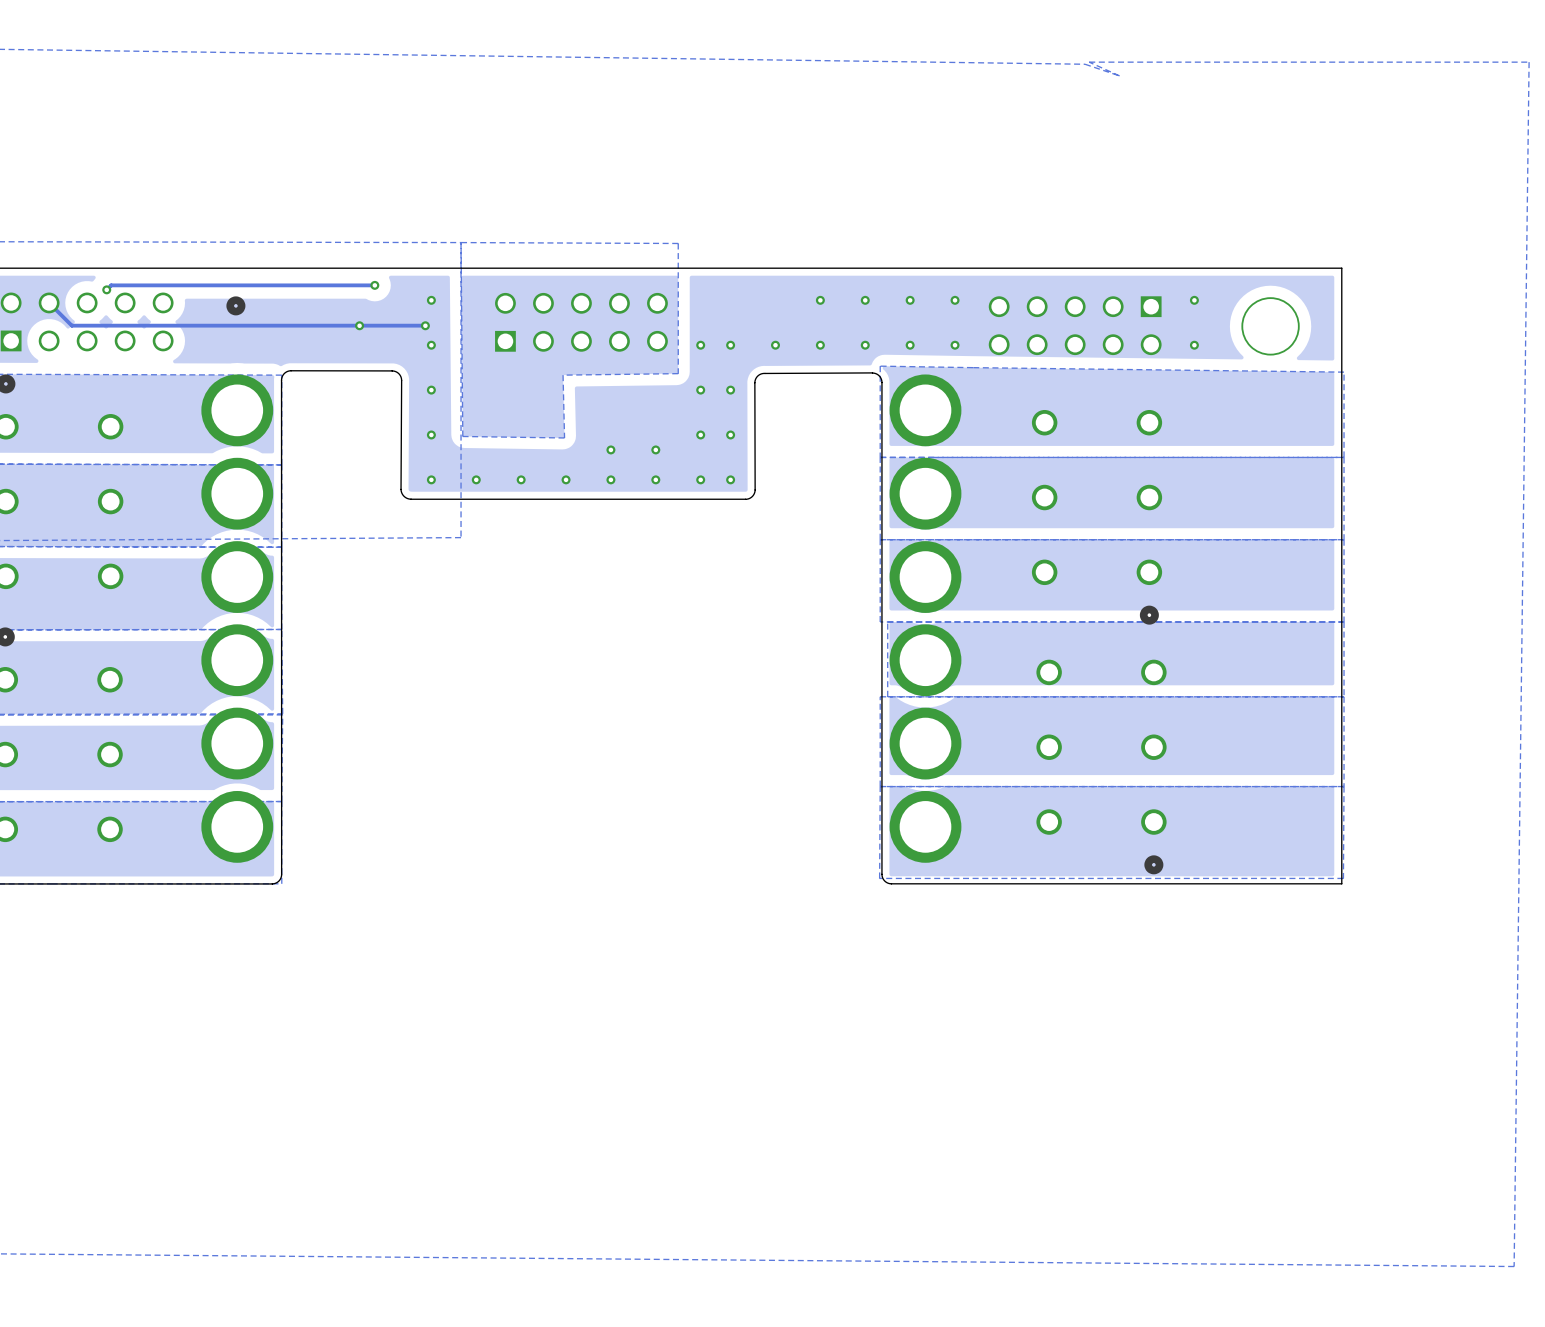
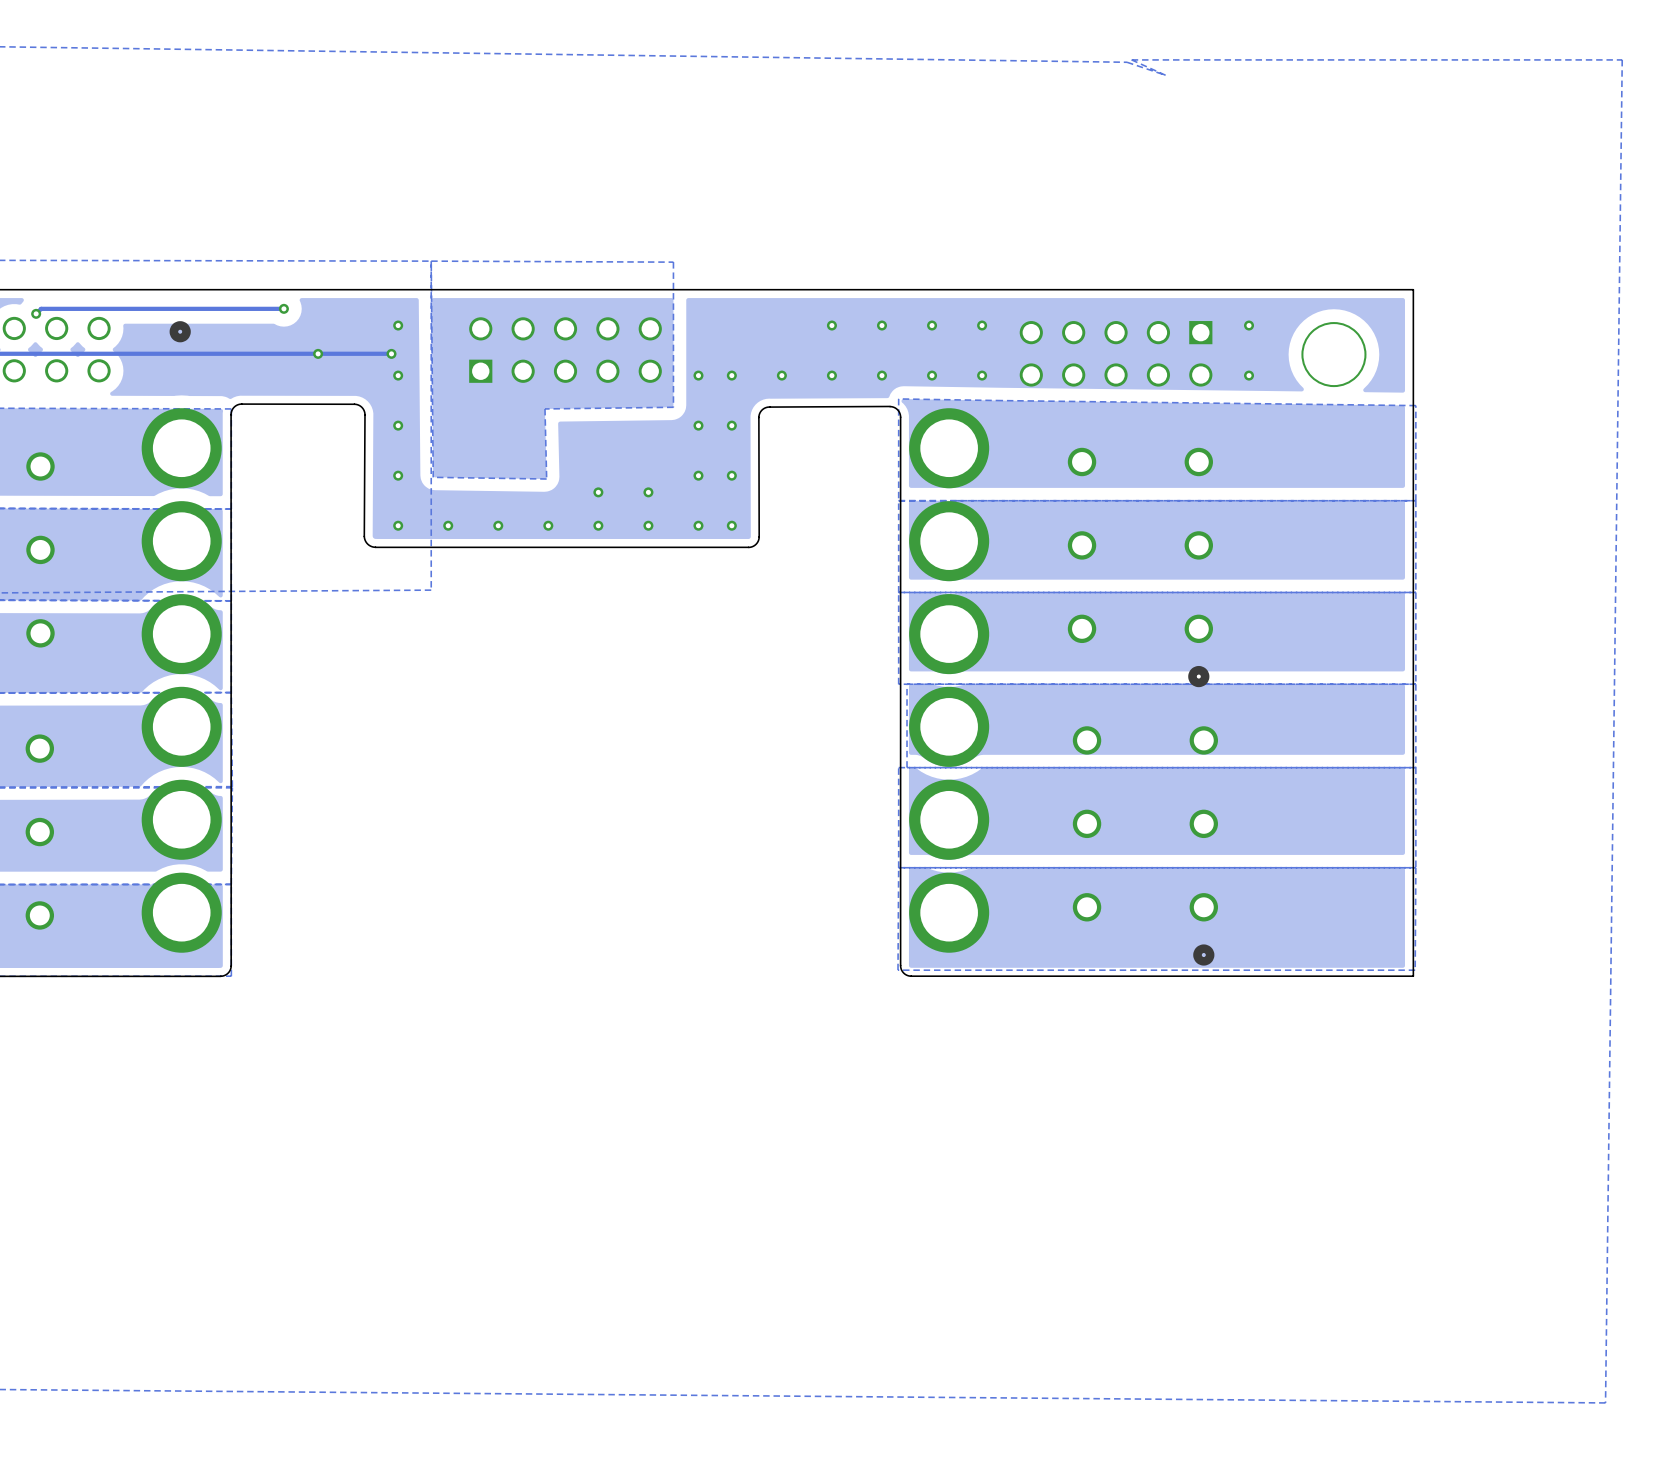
track: (374, 285) (328, 285) -> none
via position: (374, 285) -> (283, 308)

